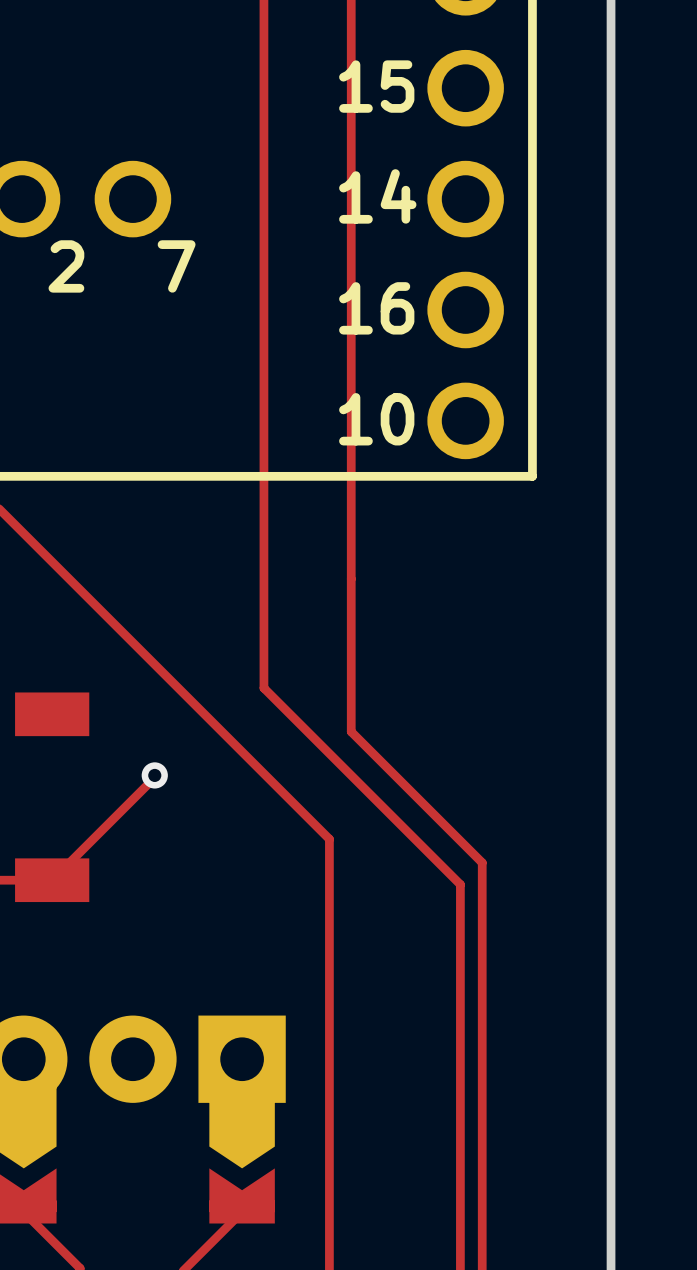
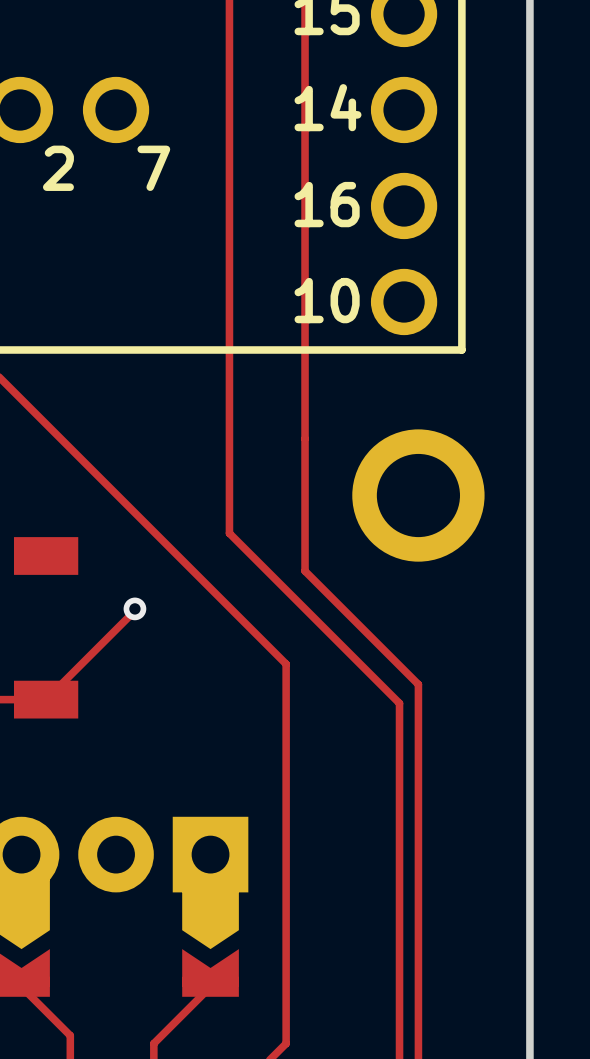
part: none -> (418, 495)

